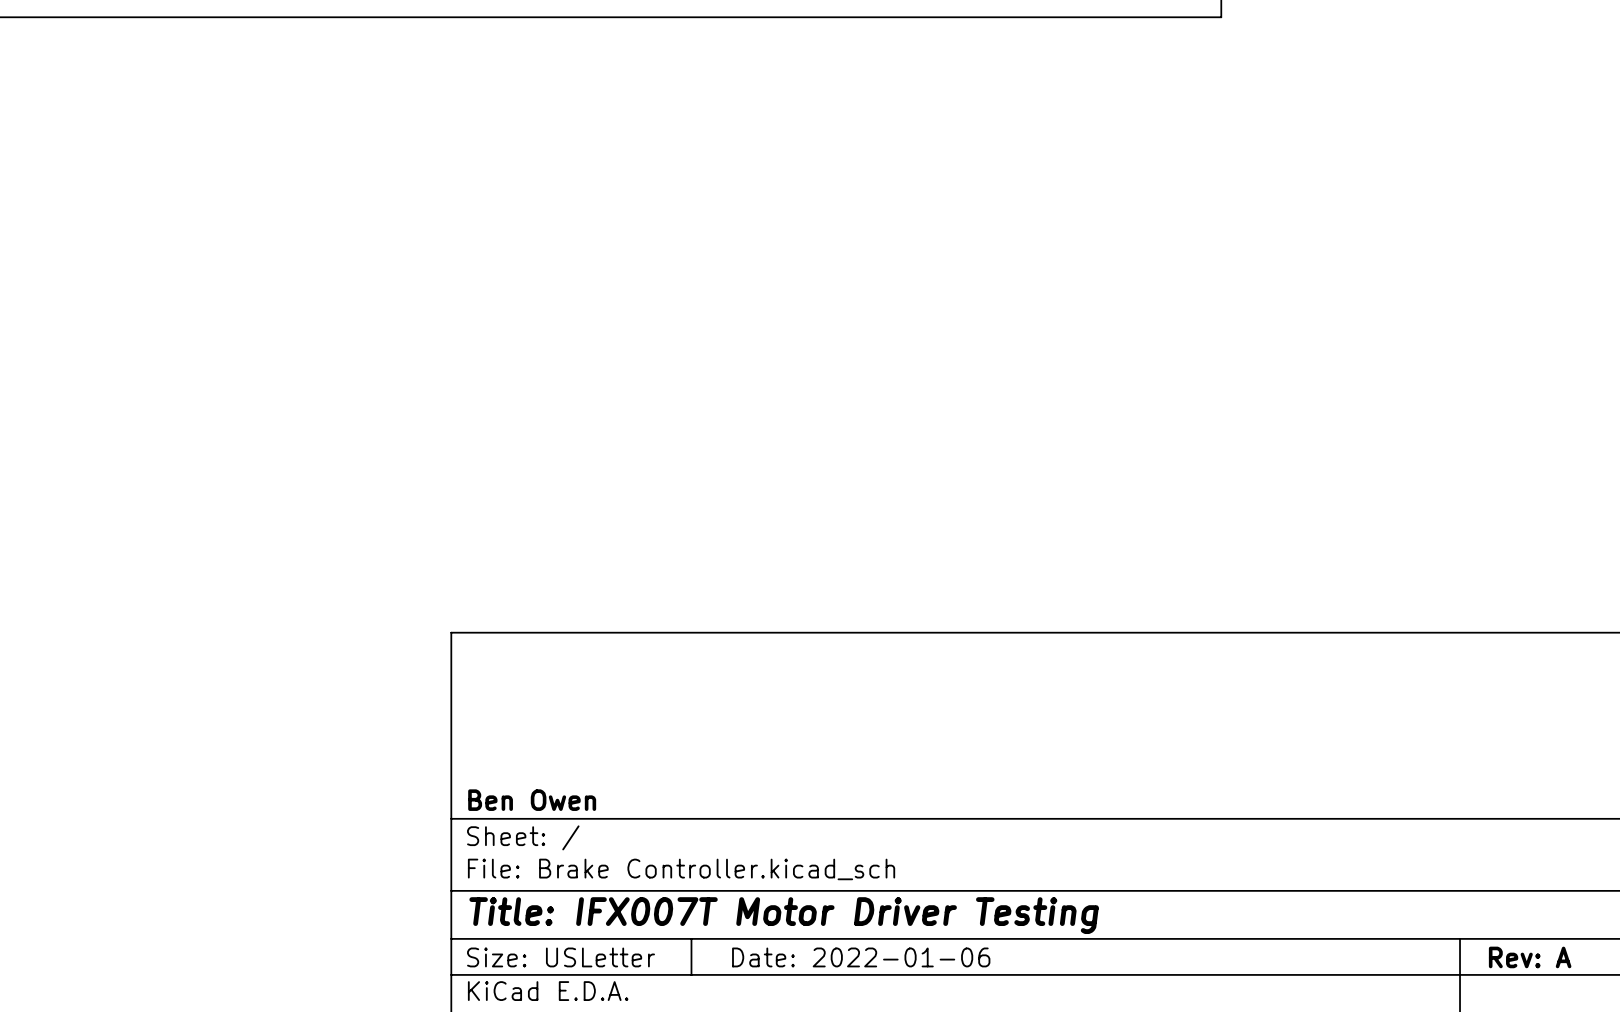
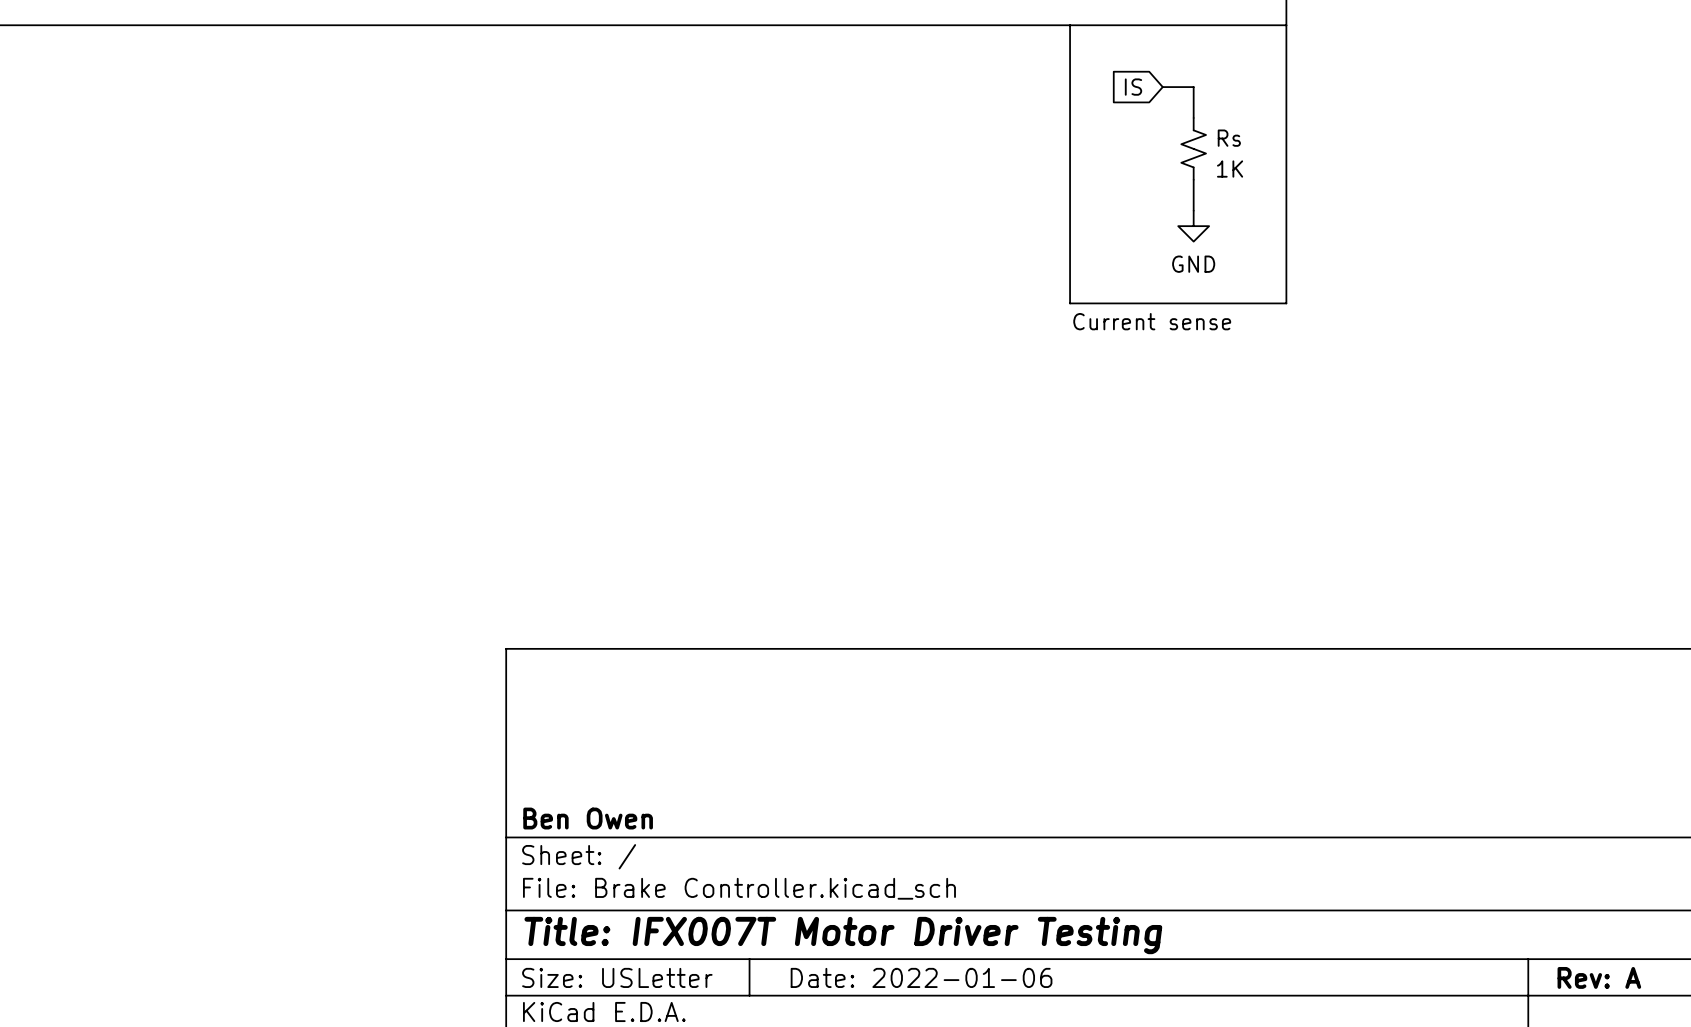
line: none -> (1070, 25) (1070, 303) (1286, 303) (1286, 25)
global label: none -> IS (1133, 87)
wire: none -> (1162, 87) (1193, 87) (1193, 117)
Rs: none -> 1K (1193, 148)
wire: none -> (1193, 179) (1193, 210)
power symbol: none -> GND (1193, 226)
text: none -> Current sense (1152, 321)

